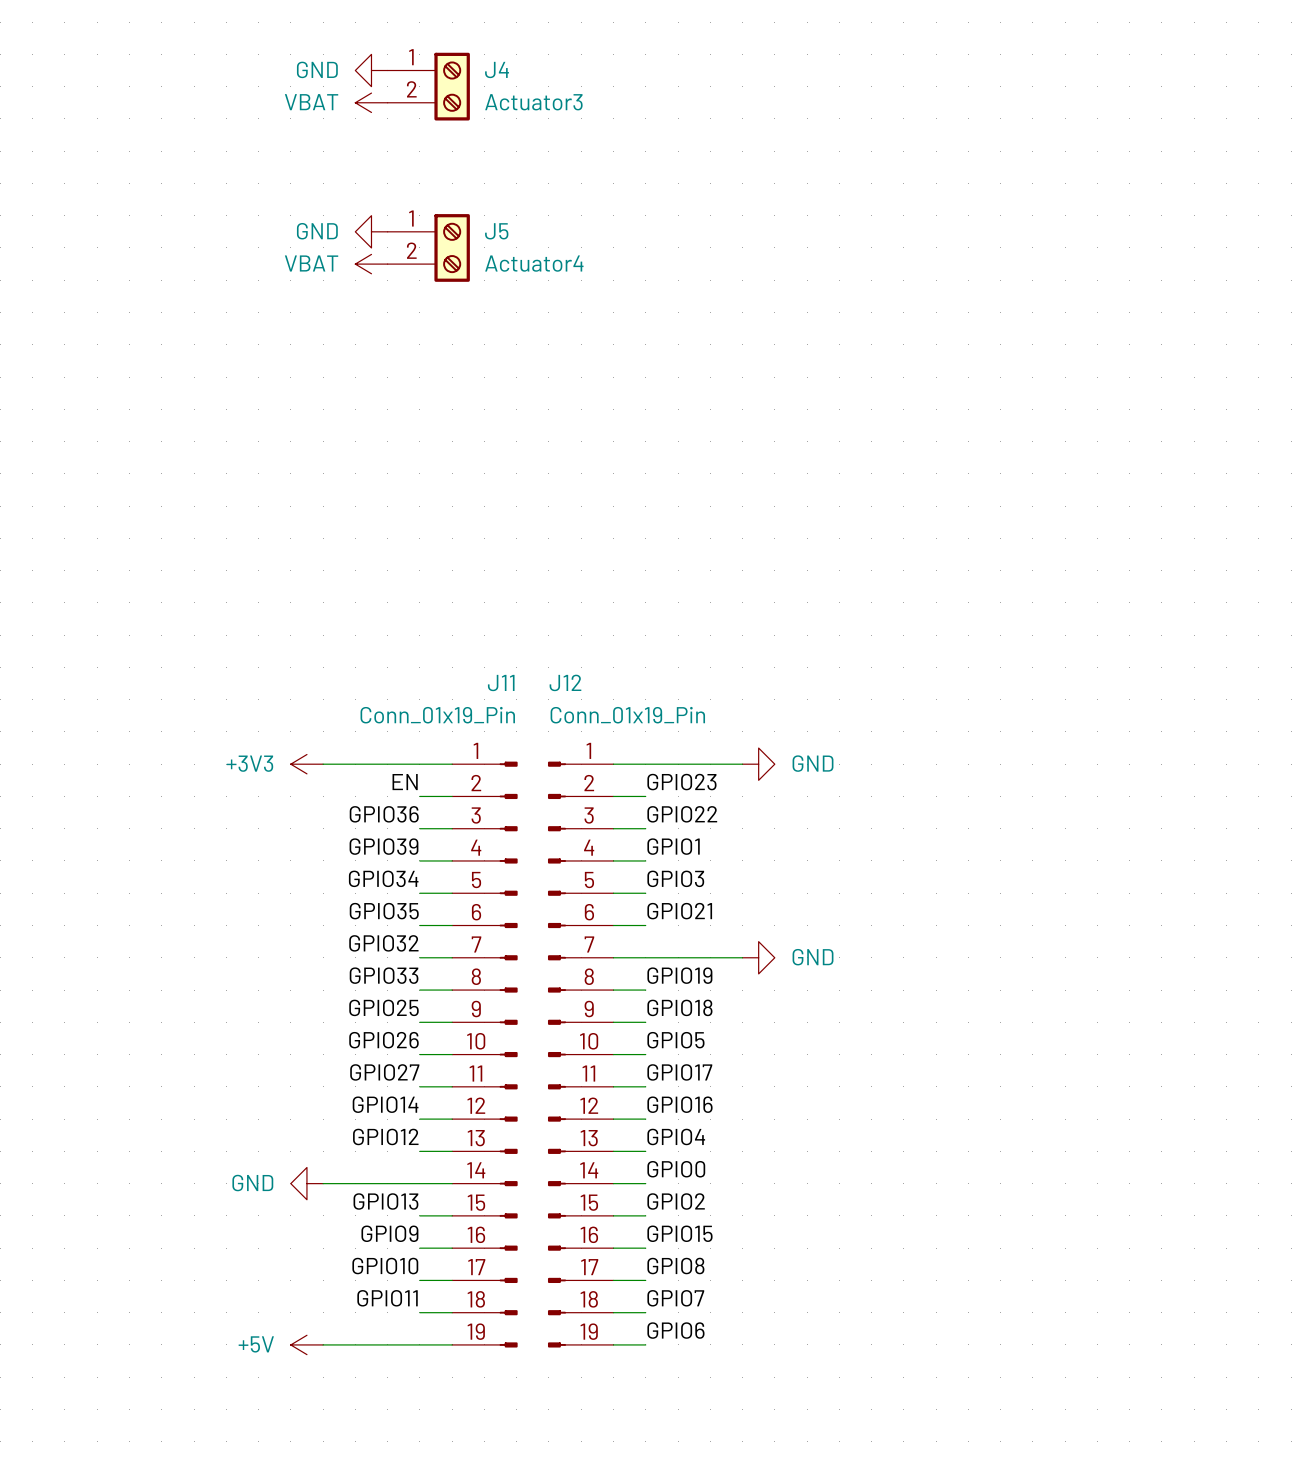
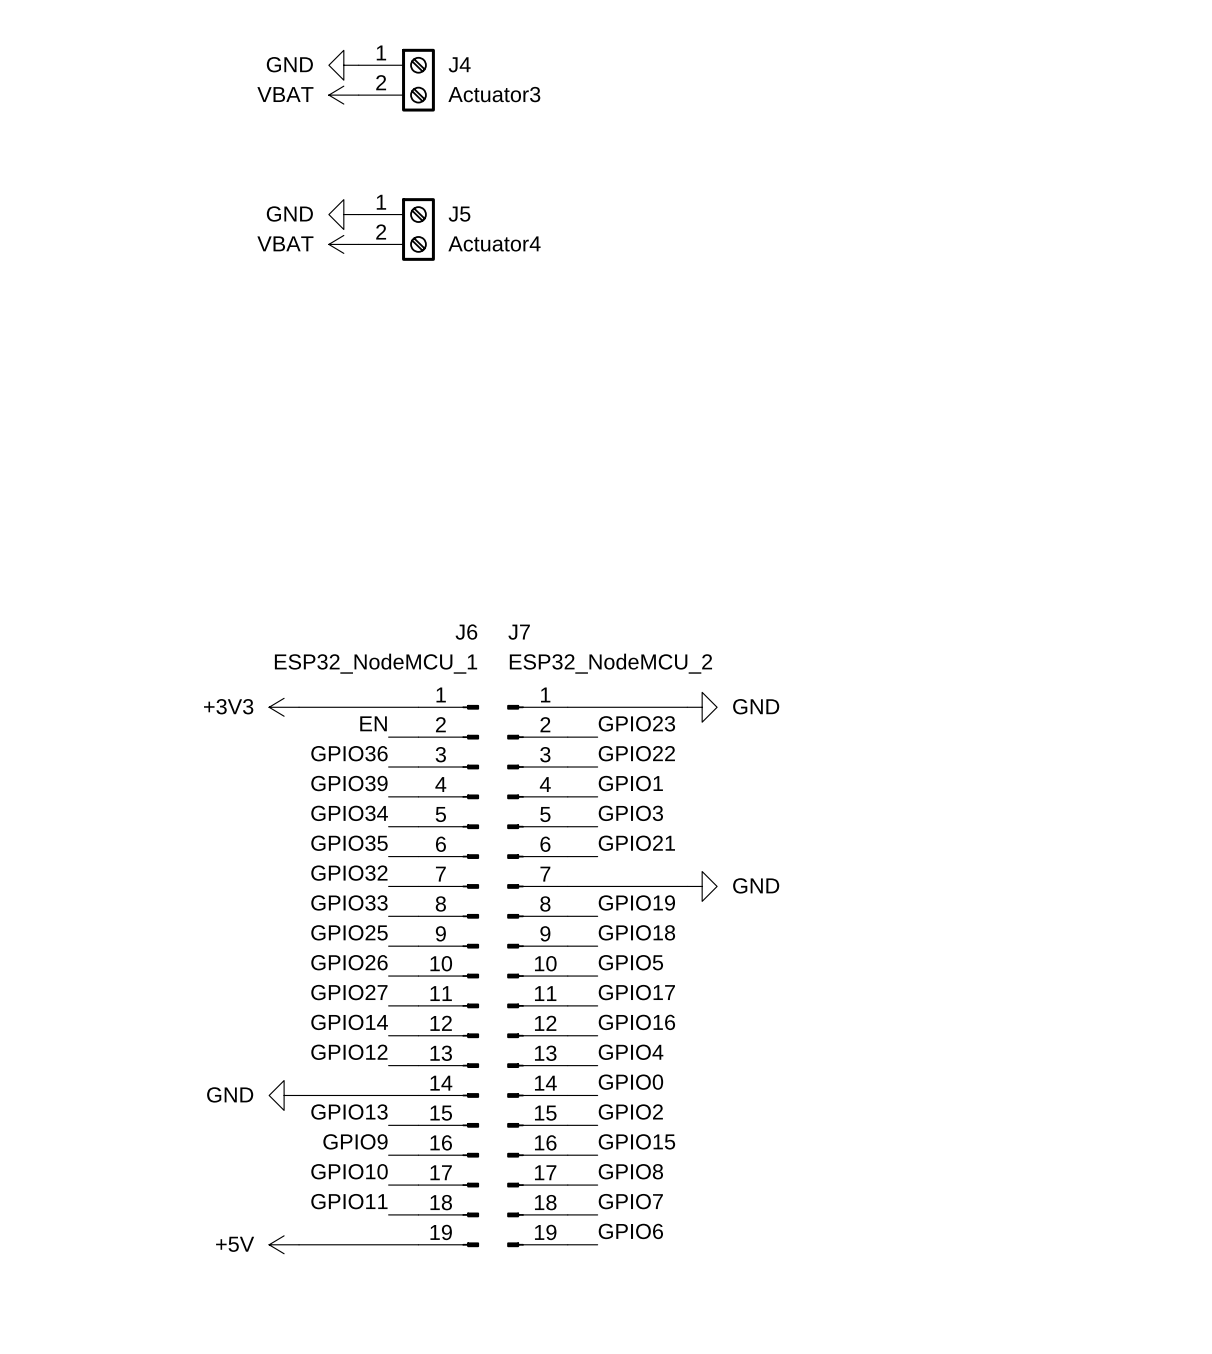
J12 name: J12 (565, 682) -> J7 (519, 632)
J11 name: J11 (501, 683) -> J6 (466, 632)
J11 value: Conn_01x19_Pin (437, 715) -> ESP32_NodeMCU_1 (376, 663)
J12 value: Conn_01x19_Pin (627, 715) -> ESP32_NodeMCU_2 (610, 663)

